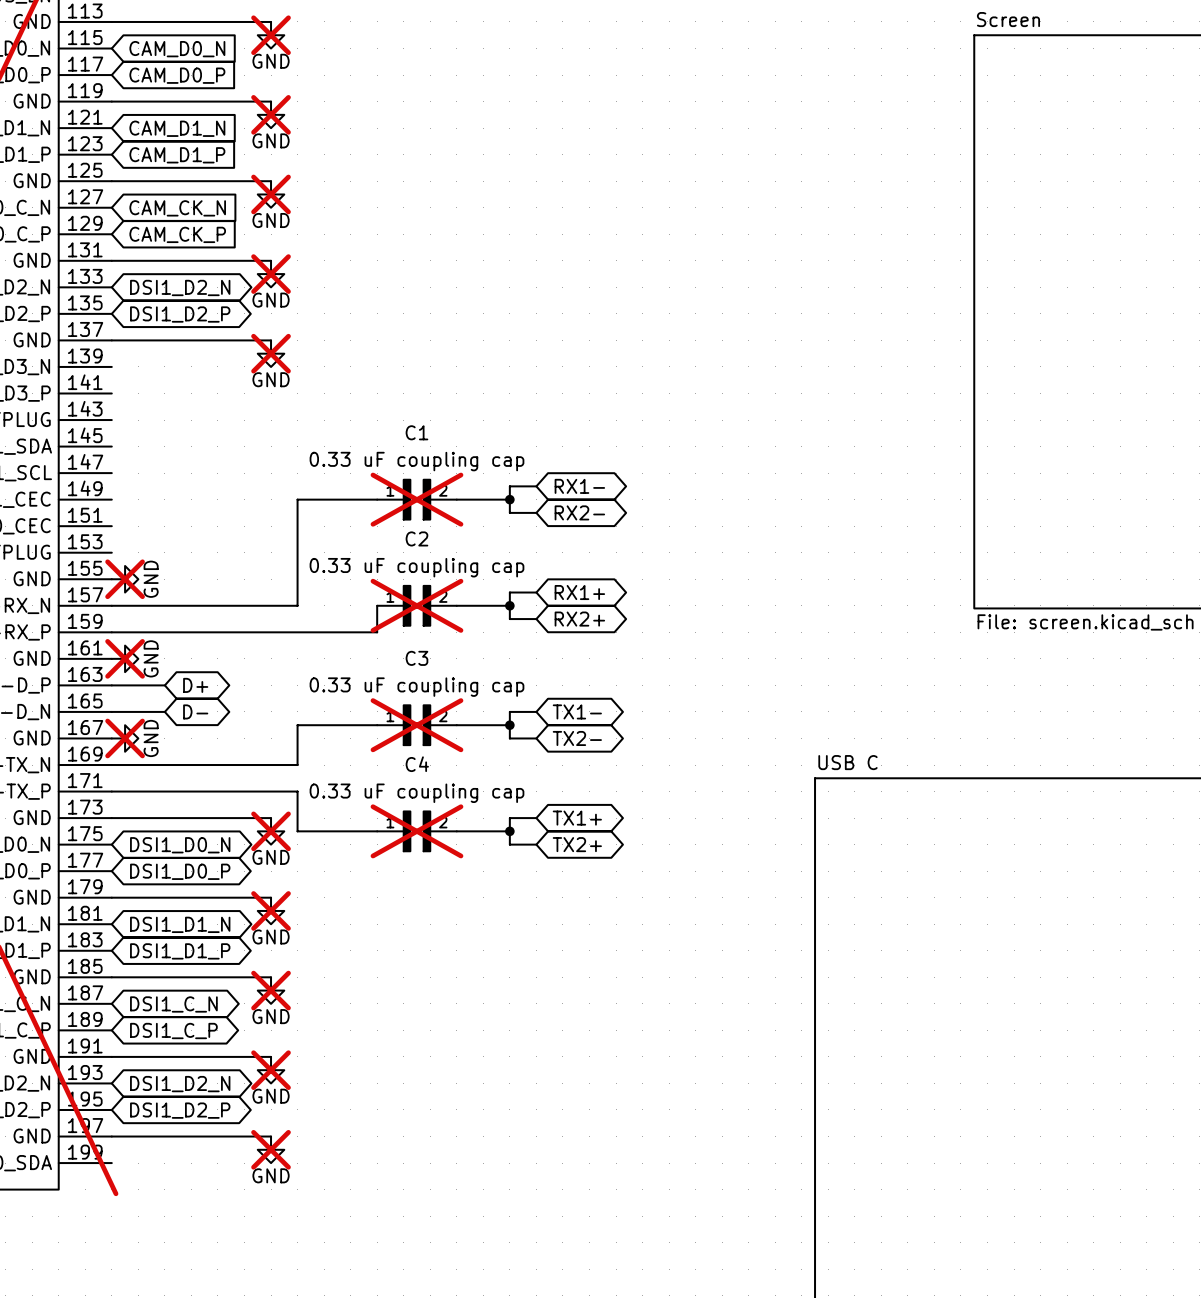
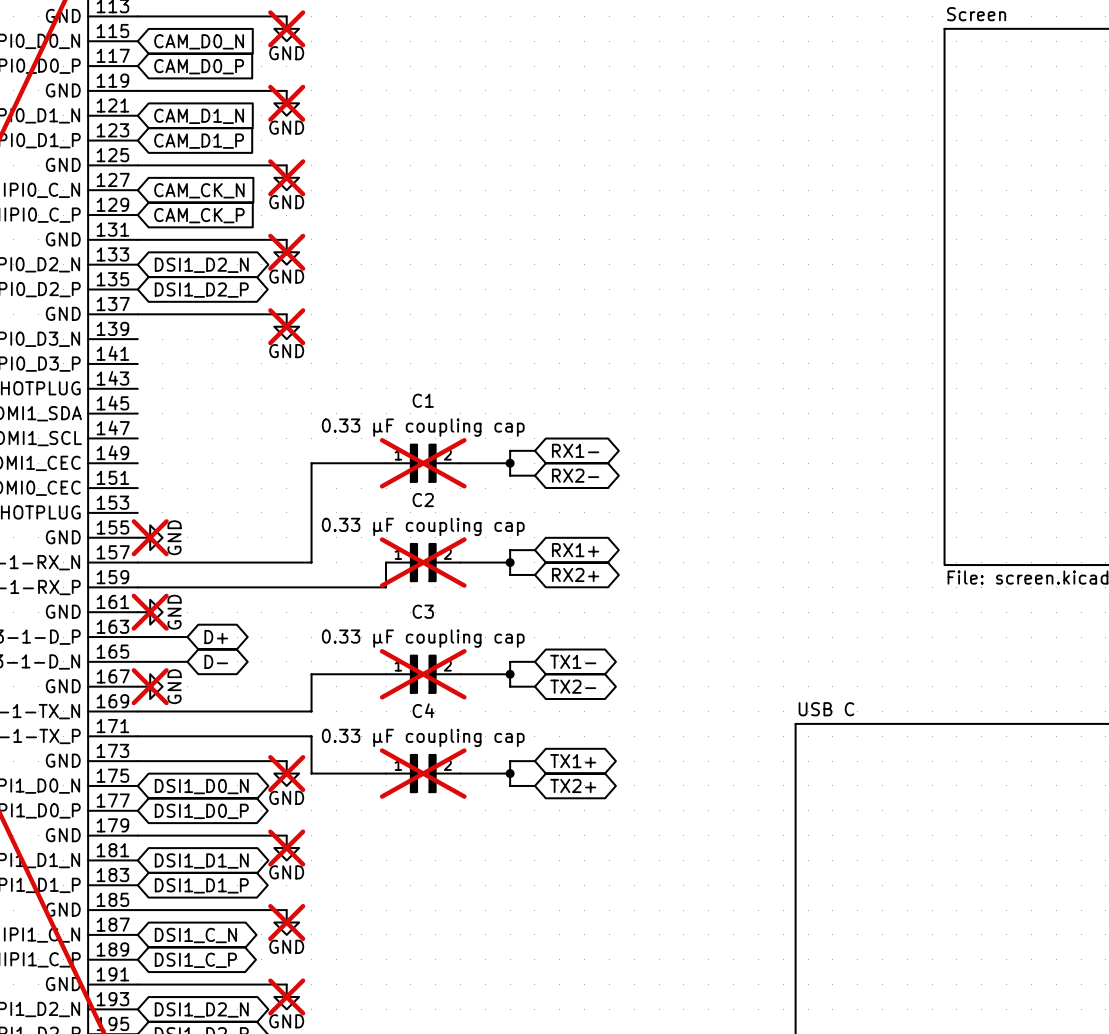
C1 value: 0.33 uF coupling cap (416, 461) -> 0.33 µF coupling cap (423, 427)
C2 value: 0.33 uF coupling cap (416, 567) -> 0.33 µF coupling cap (423, 526)
C3 value: 0.33 uF coupling cap (416, 687) -> 0.33 µF coupling cap (423, 638)
C4 value: 0.33 uF coupling cap (416, 793) -> 0.33 µF coupling cap (423, 737)

